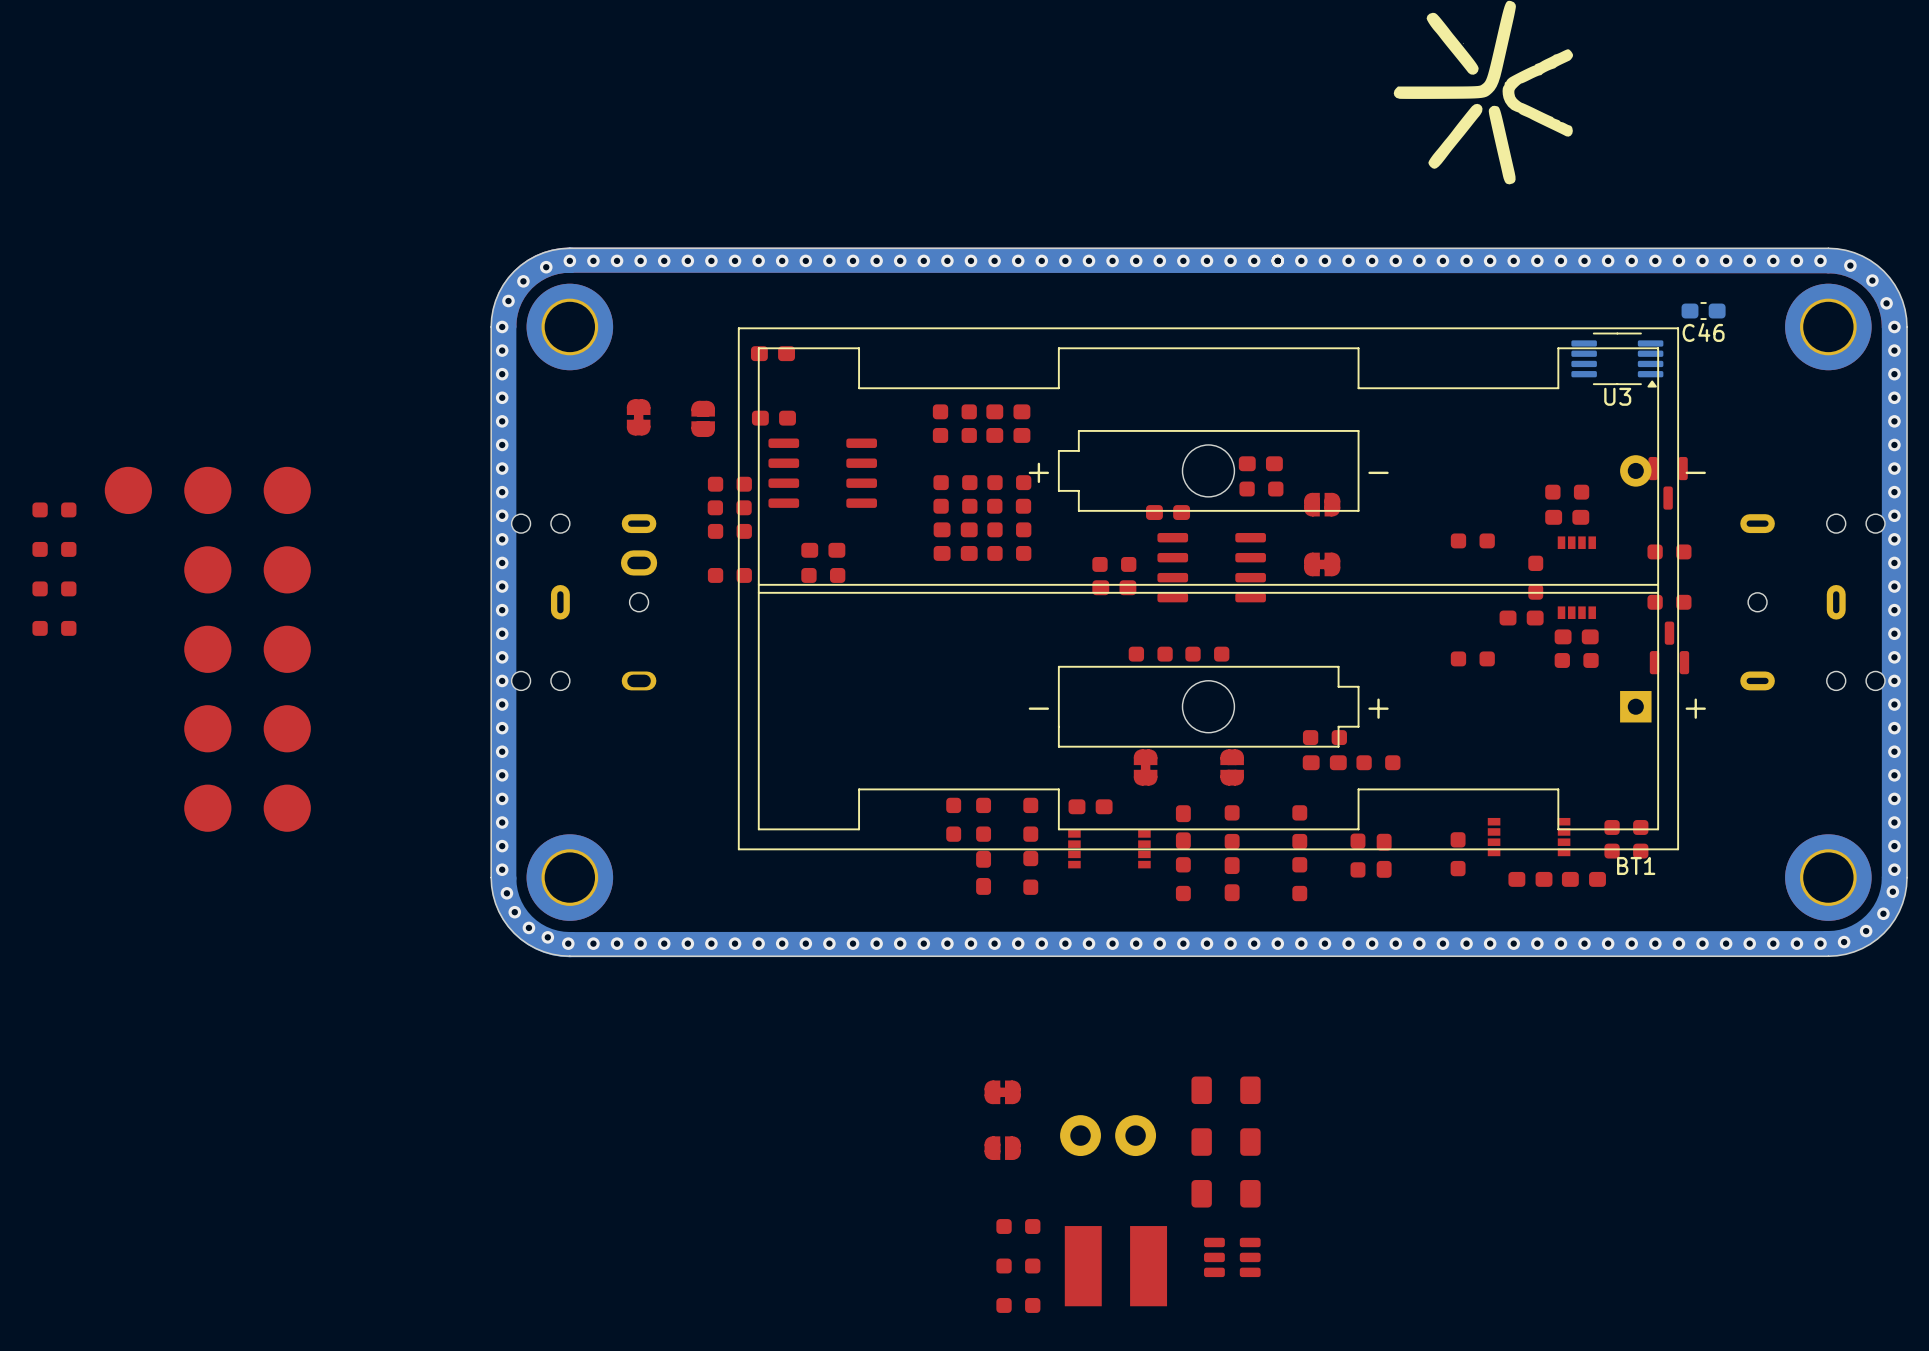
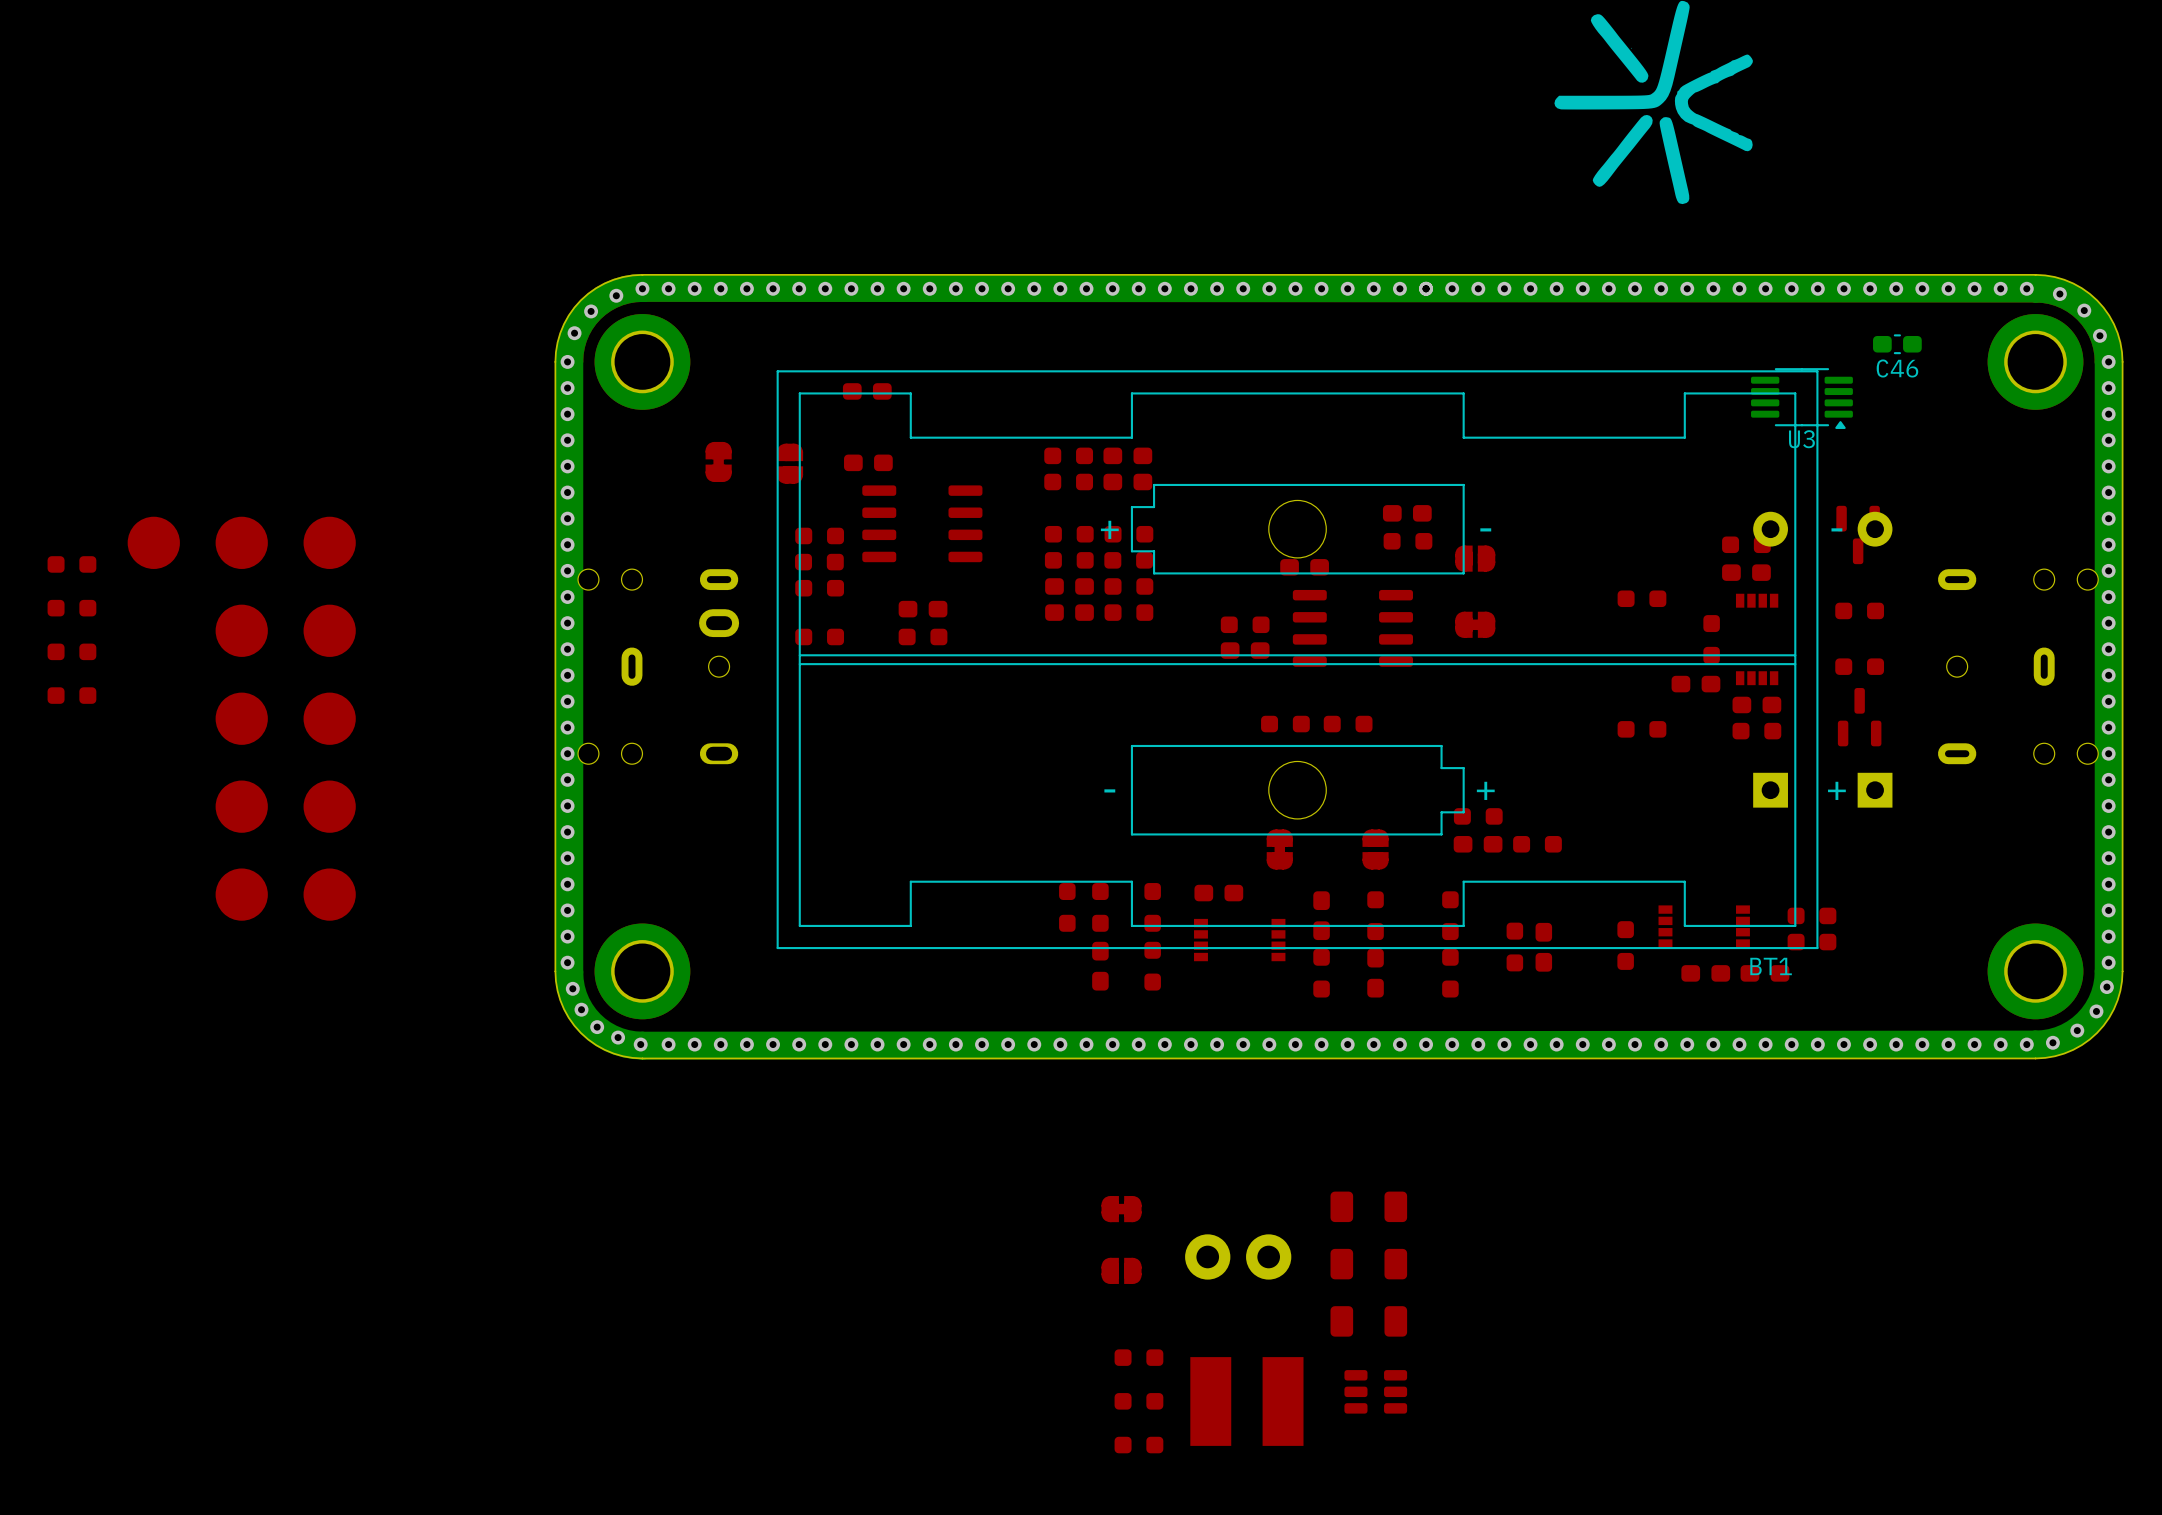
BT1 footprint: [737, 327, 1680, 851] -> [776, 370, 1893, 950]
BT1 name position: BT1 (1636, 865) -> BT1 (1771, 966)

